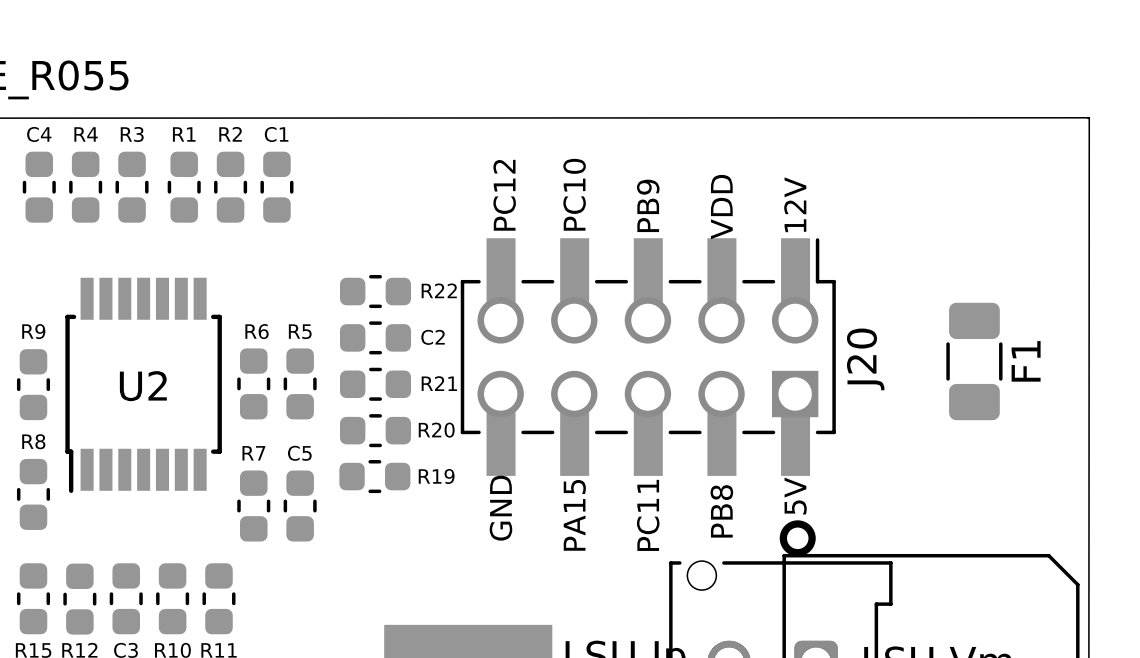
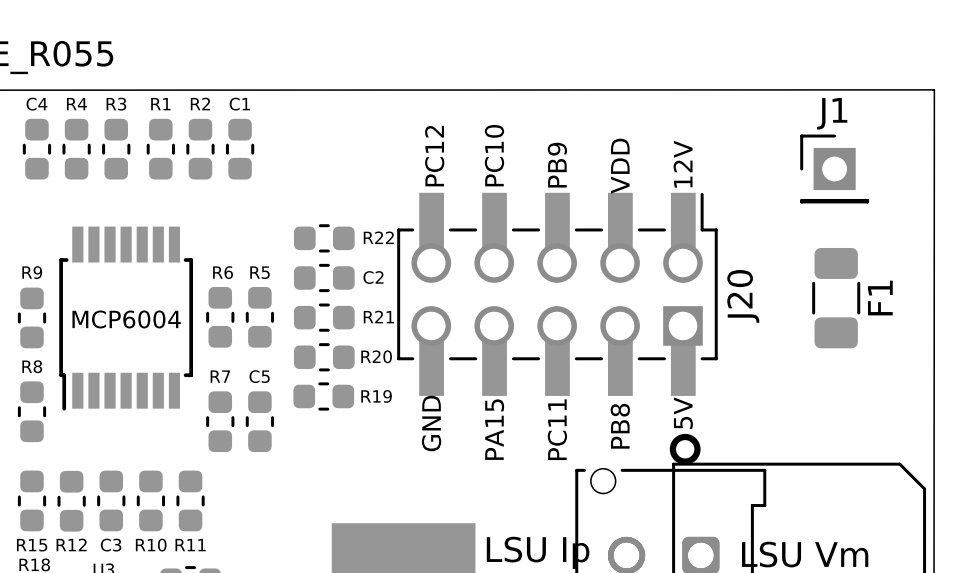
J1: none -> (834, 168)
U2 name: U2 (143, 386) -> MCP6004 (126, 319)

